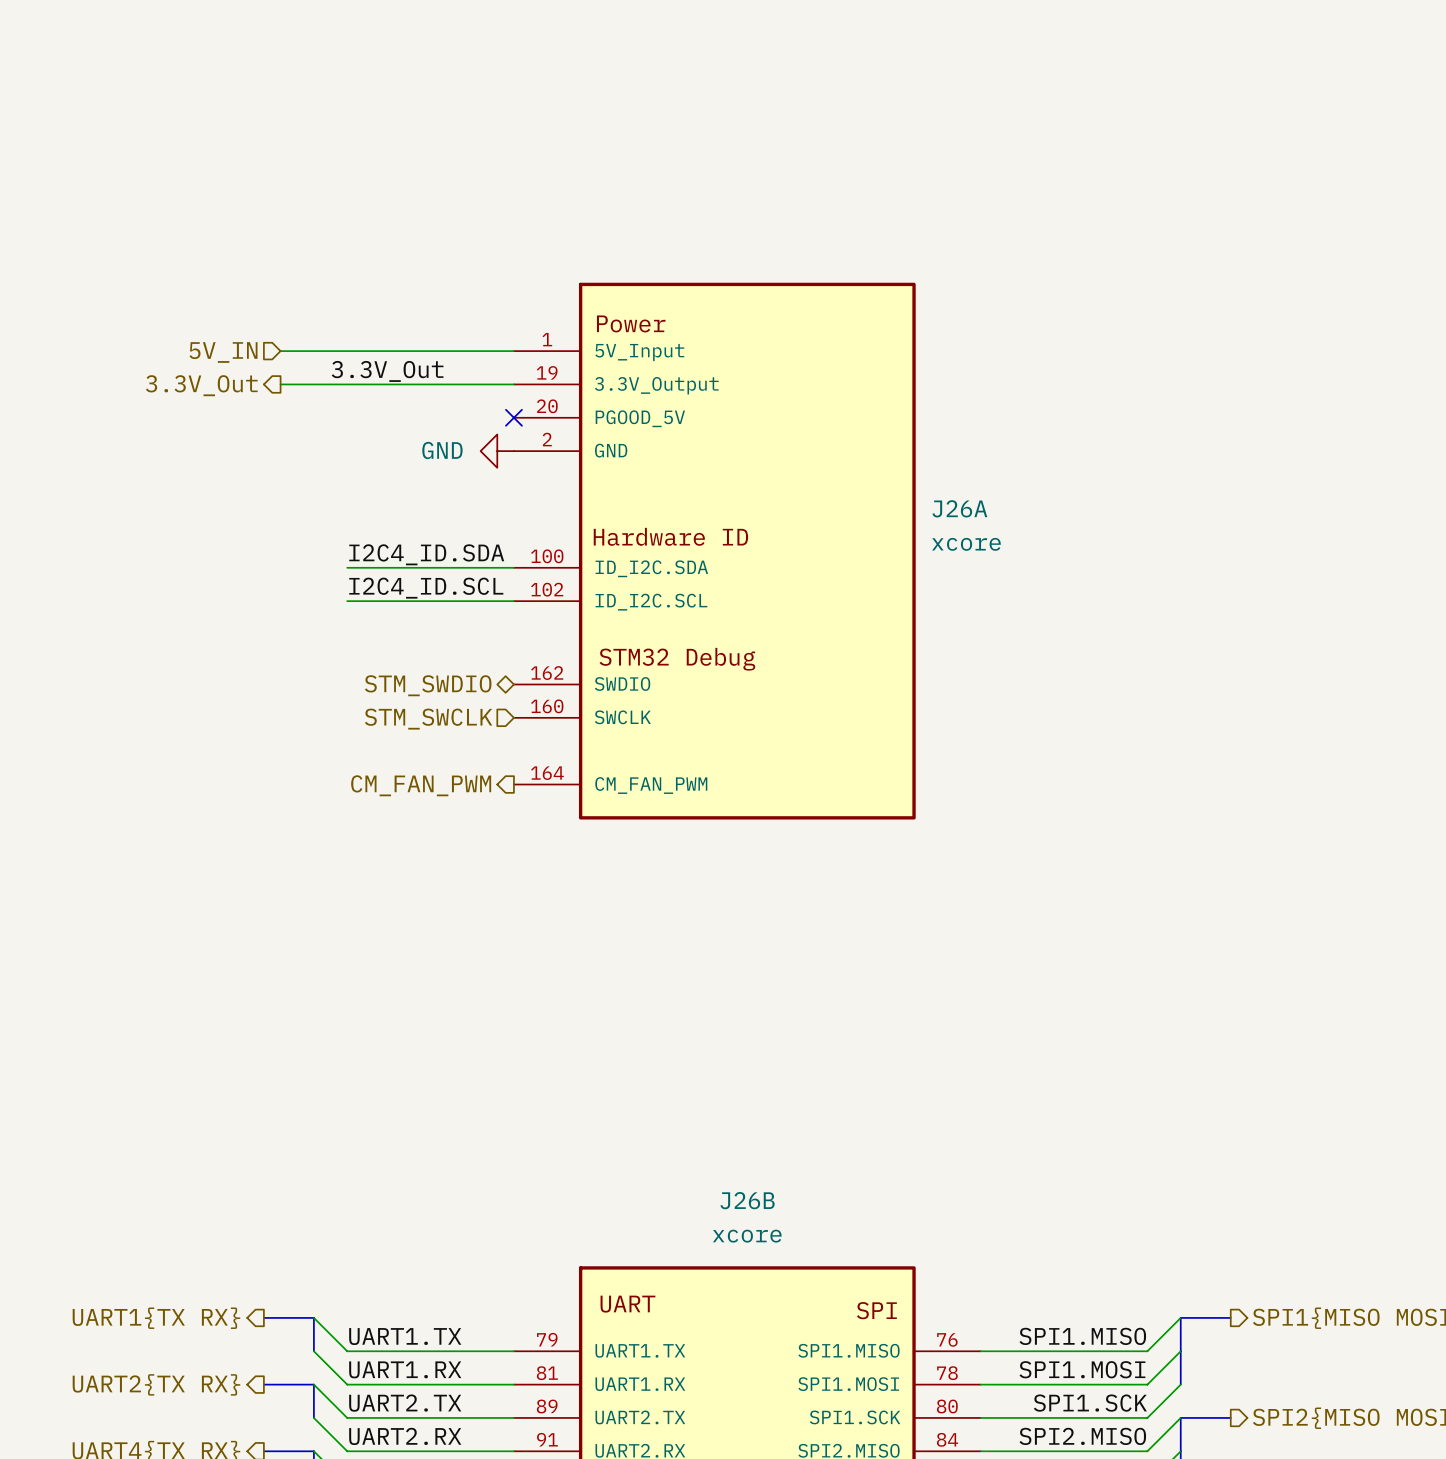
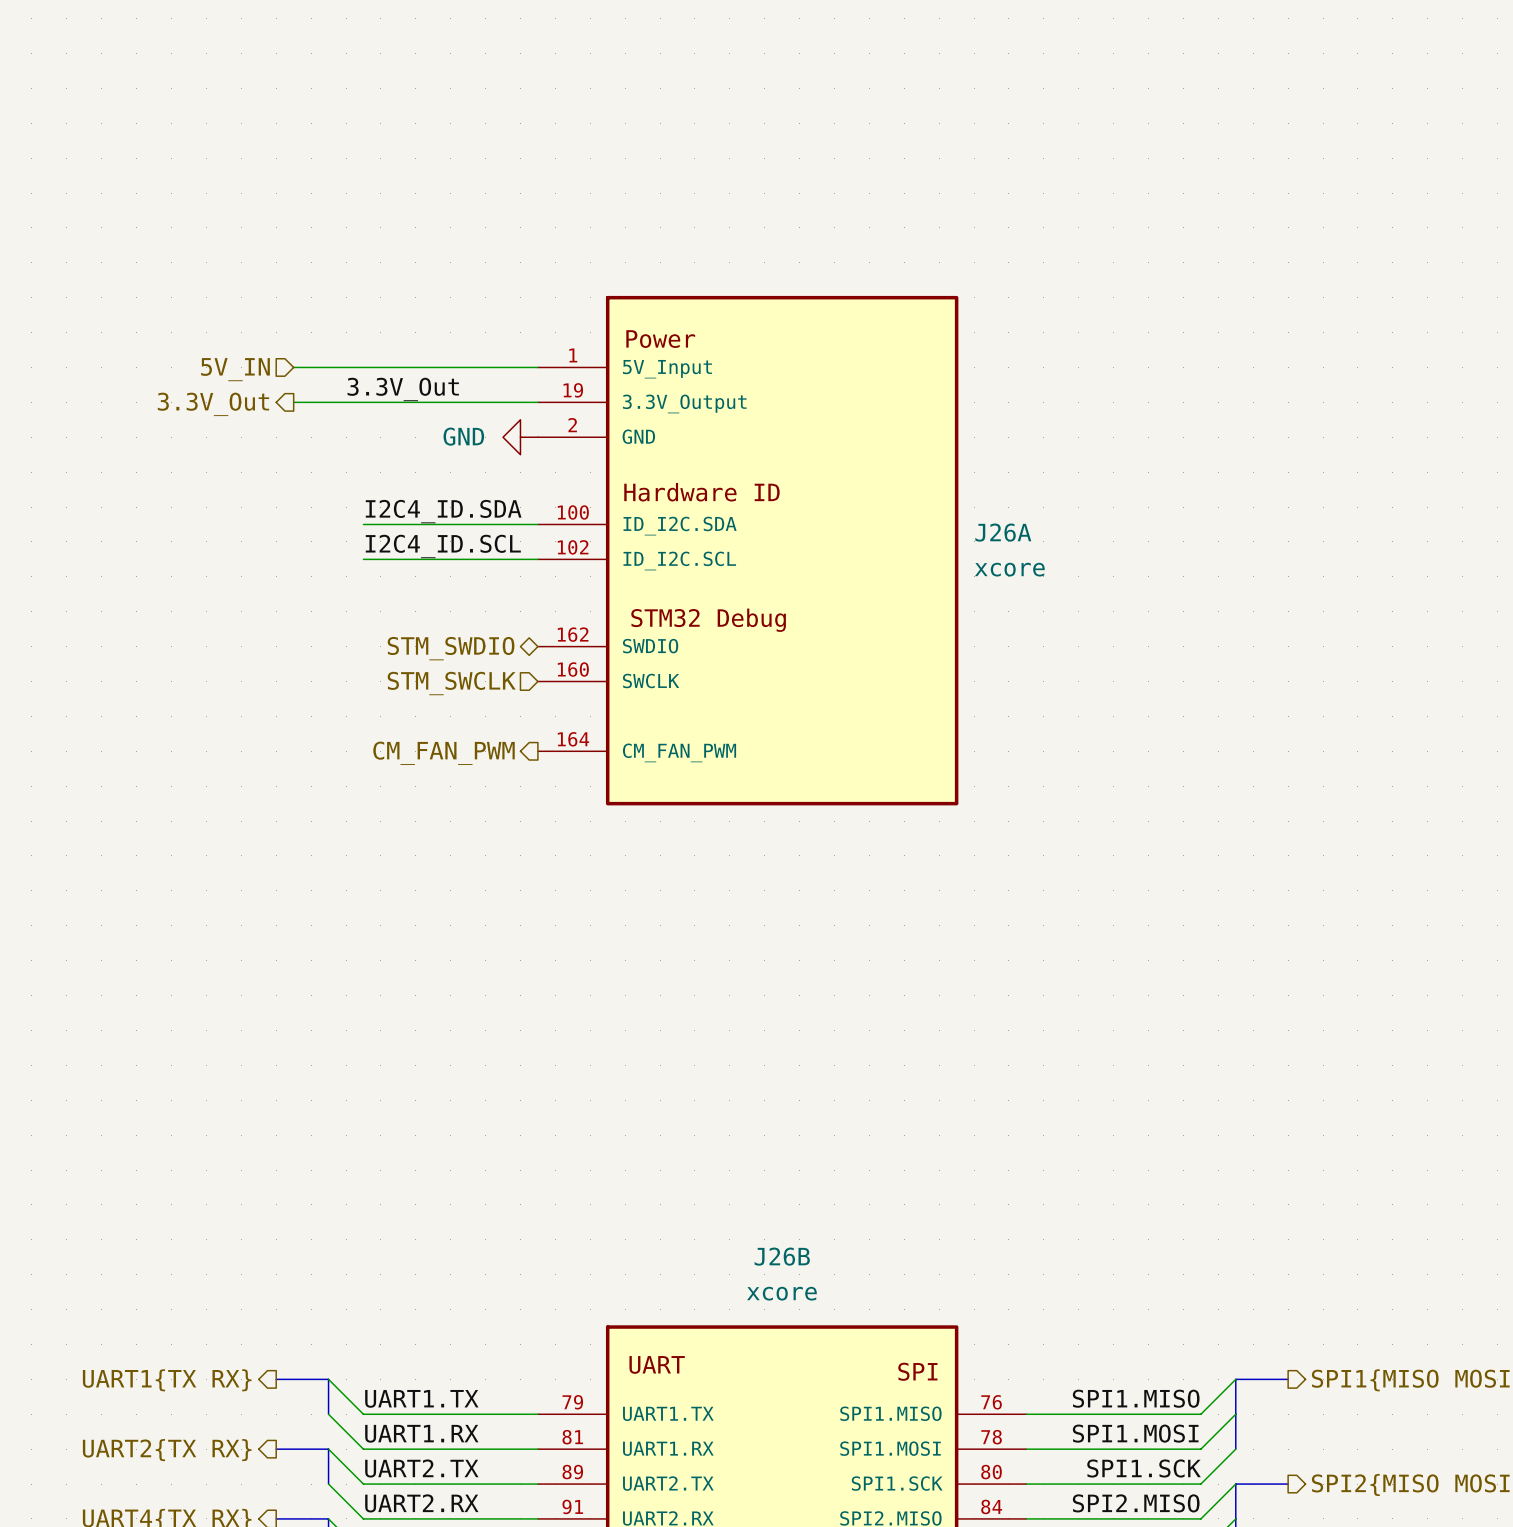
J26A symbol: [513, 282, 916, 820] -> [537, 295, 959, 806]
no-connect mark: (513, 417) -> none
power symbol position: GND (497, 451) -> GND (520, 437)
label position: I2C4_ID.SDA (426, 554) -> I2C4_ID.SDA (443, 511)
wire: (347, 567) (513, 567) -> (363, 559) (537, 559)
label position: I2C4_ID.SCL (426, 588) -> I2C4_ID.SCL (443, 546)
wire: (347, 601) (513, 601) -> (363, 524) (537, 524)
hierarchical label: none -> STM_SWCLK (451, 683)
hierarchical label position: STM_SWDIO (428, 685) -> STM_SWDIO (451, 648)
hierarchical label shape: input (428, 719) -> output (444, 753)
hierarchical label: STM_SWCLK (428, 719) -> CM_FAN_PWM (444, 753)
hierarchical label: CM_FAN_PWM (421, 785) -> none

